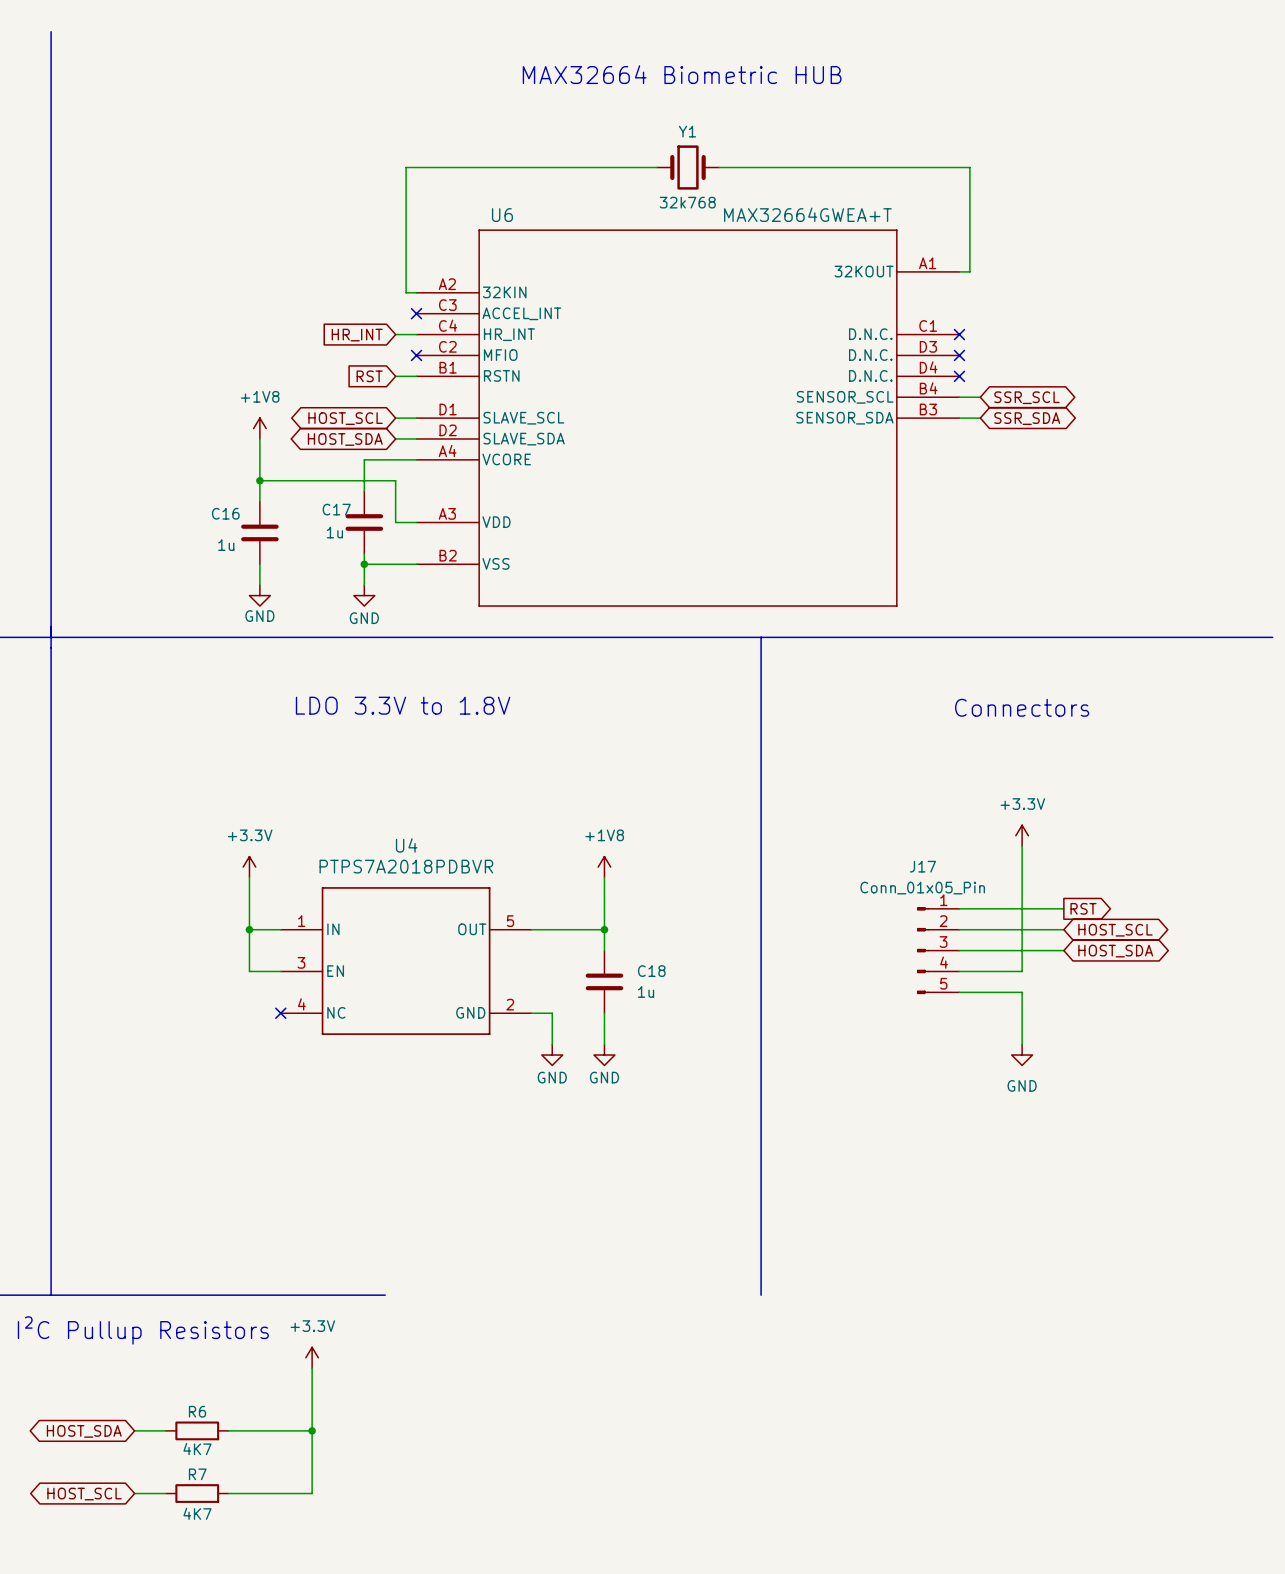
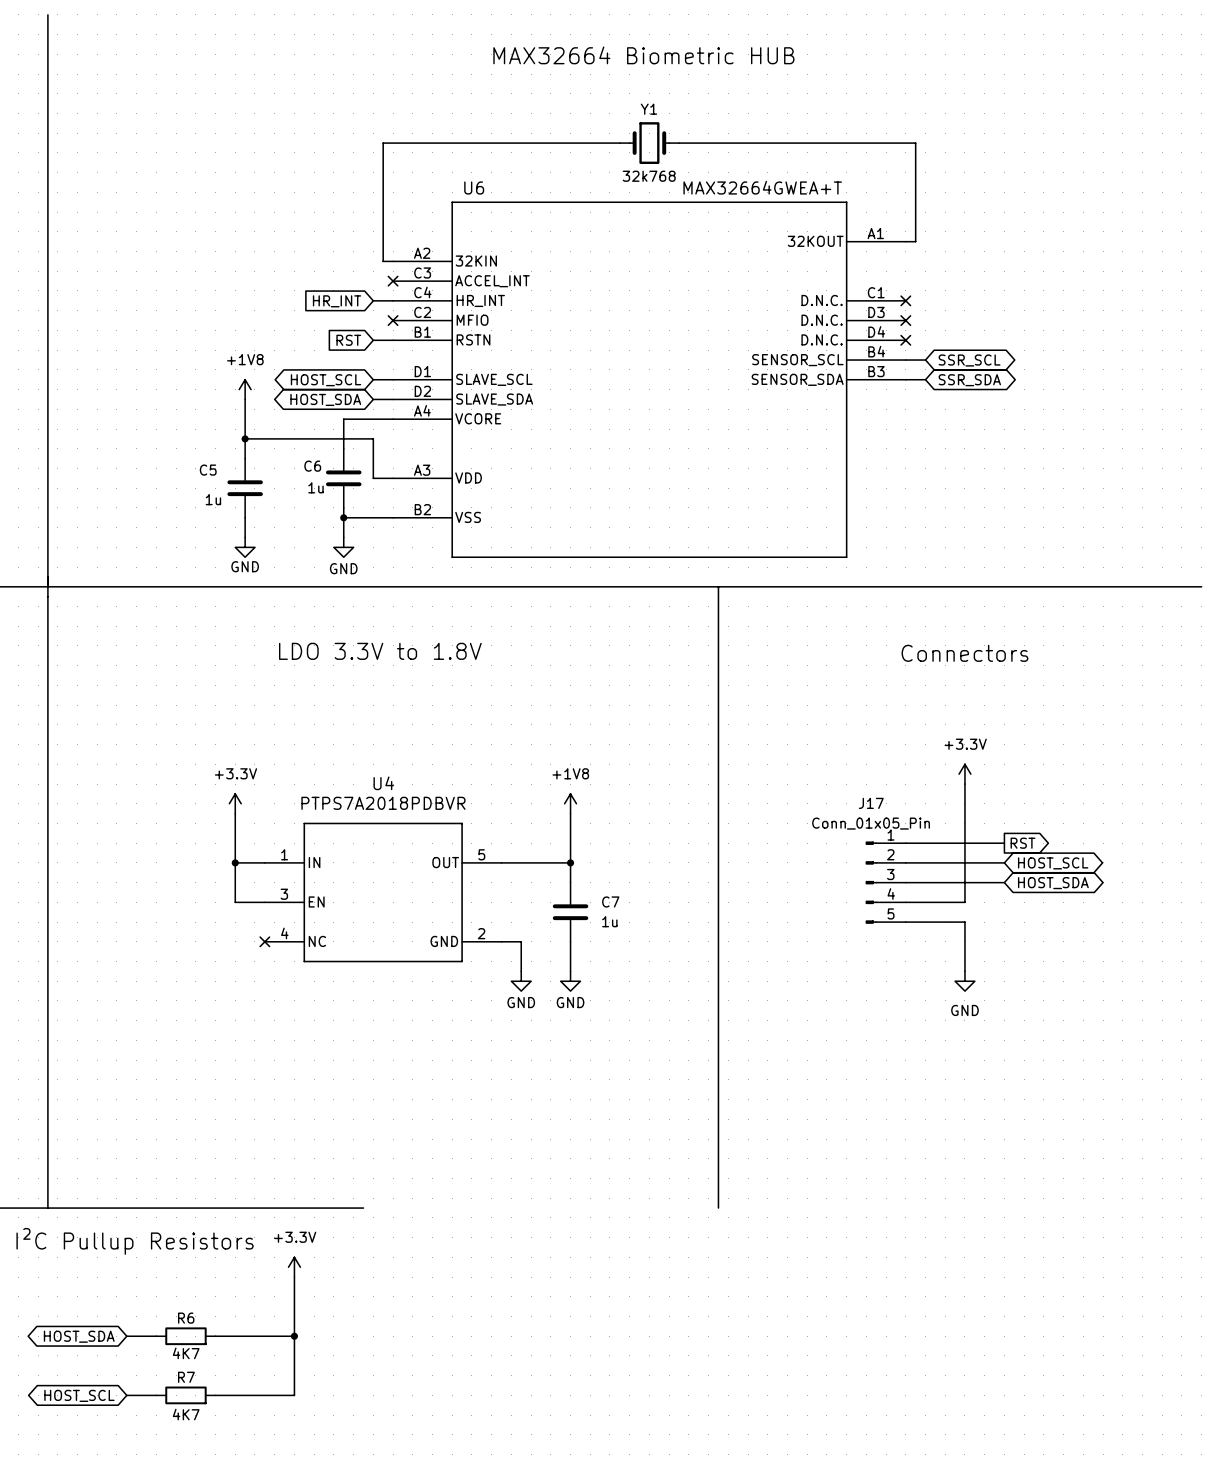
C17 name: C17 (336, 509) -> C6 (312, 466)
C16 name: C16 (225, 513) -> C5 (208, 470)
C18 name: C18 (651, 971) -> C7 (610, 901)

